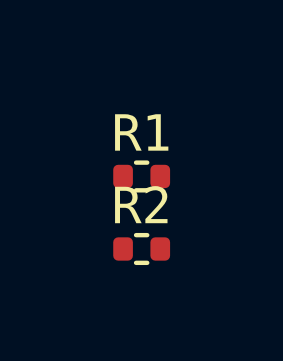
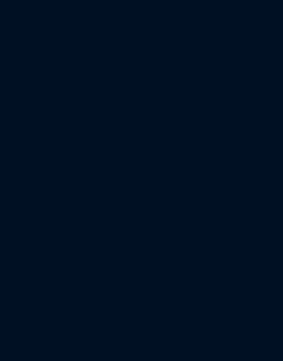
R1: (141, 176) -> none
R2: (141, 248) -> none

